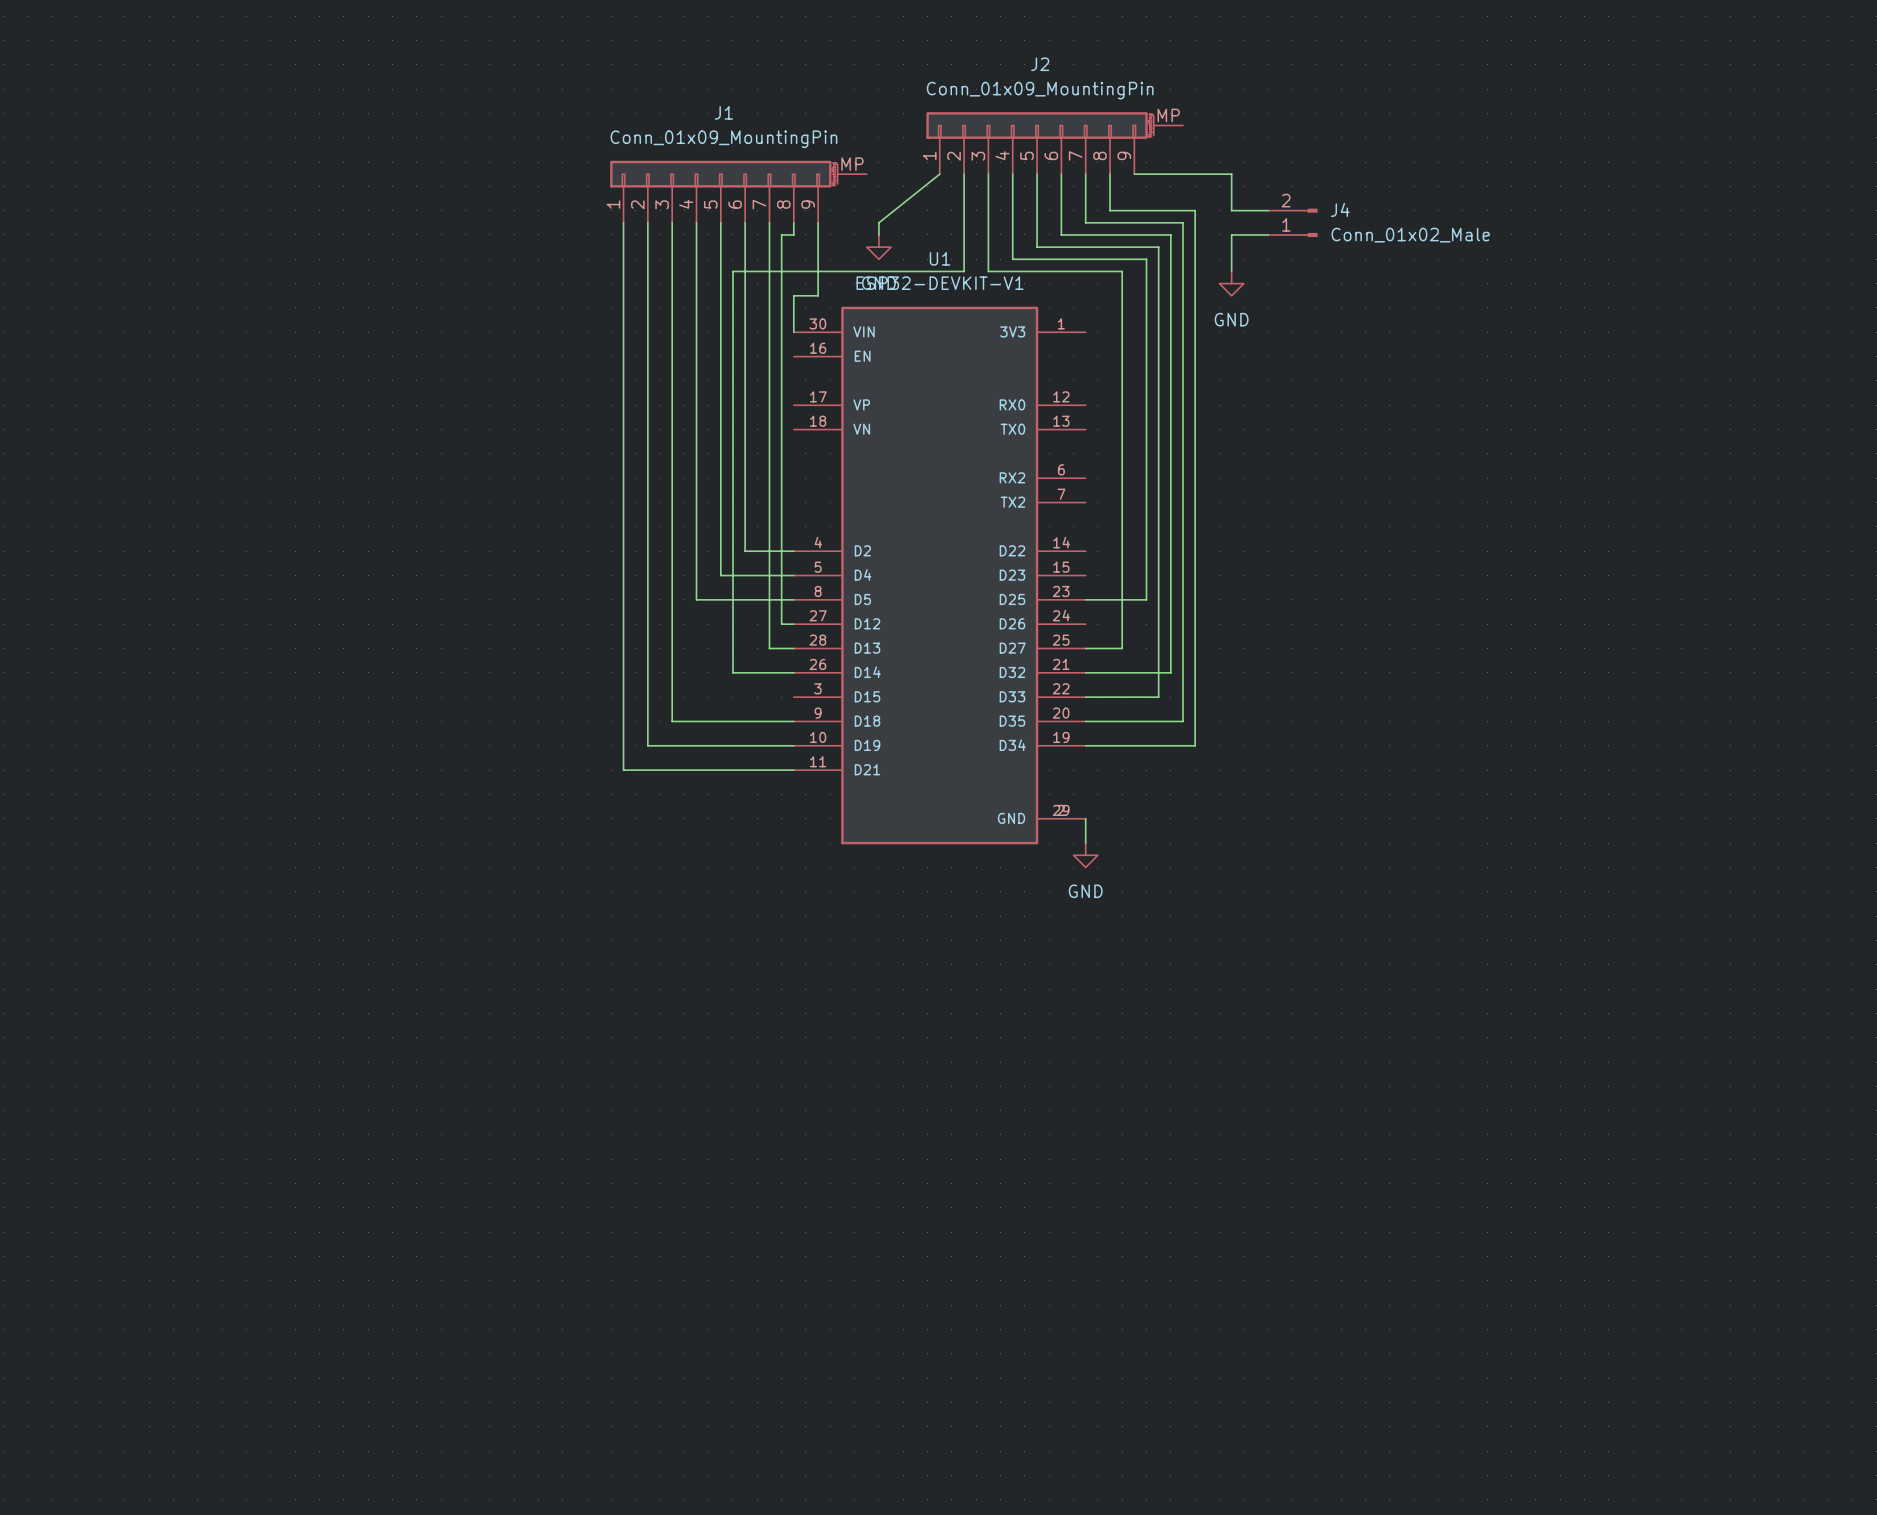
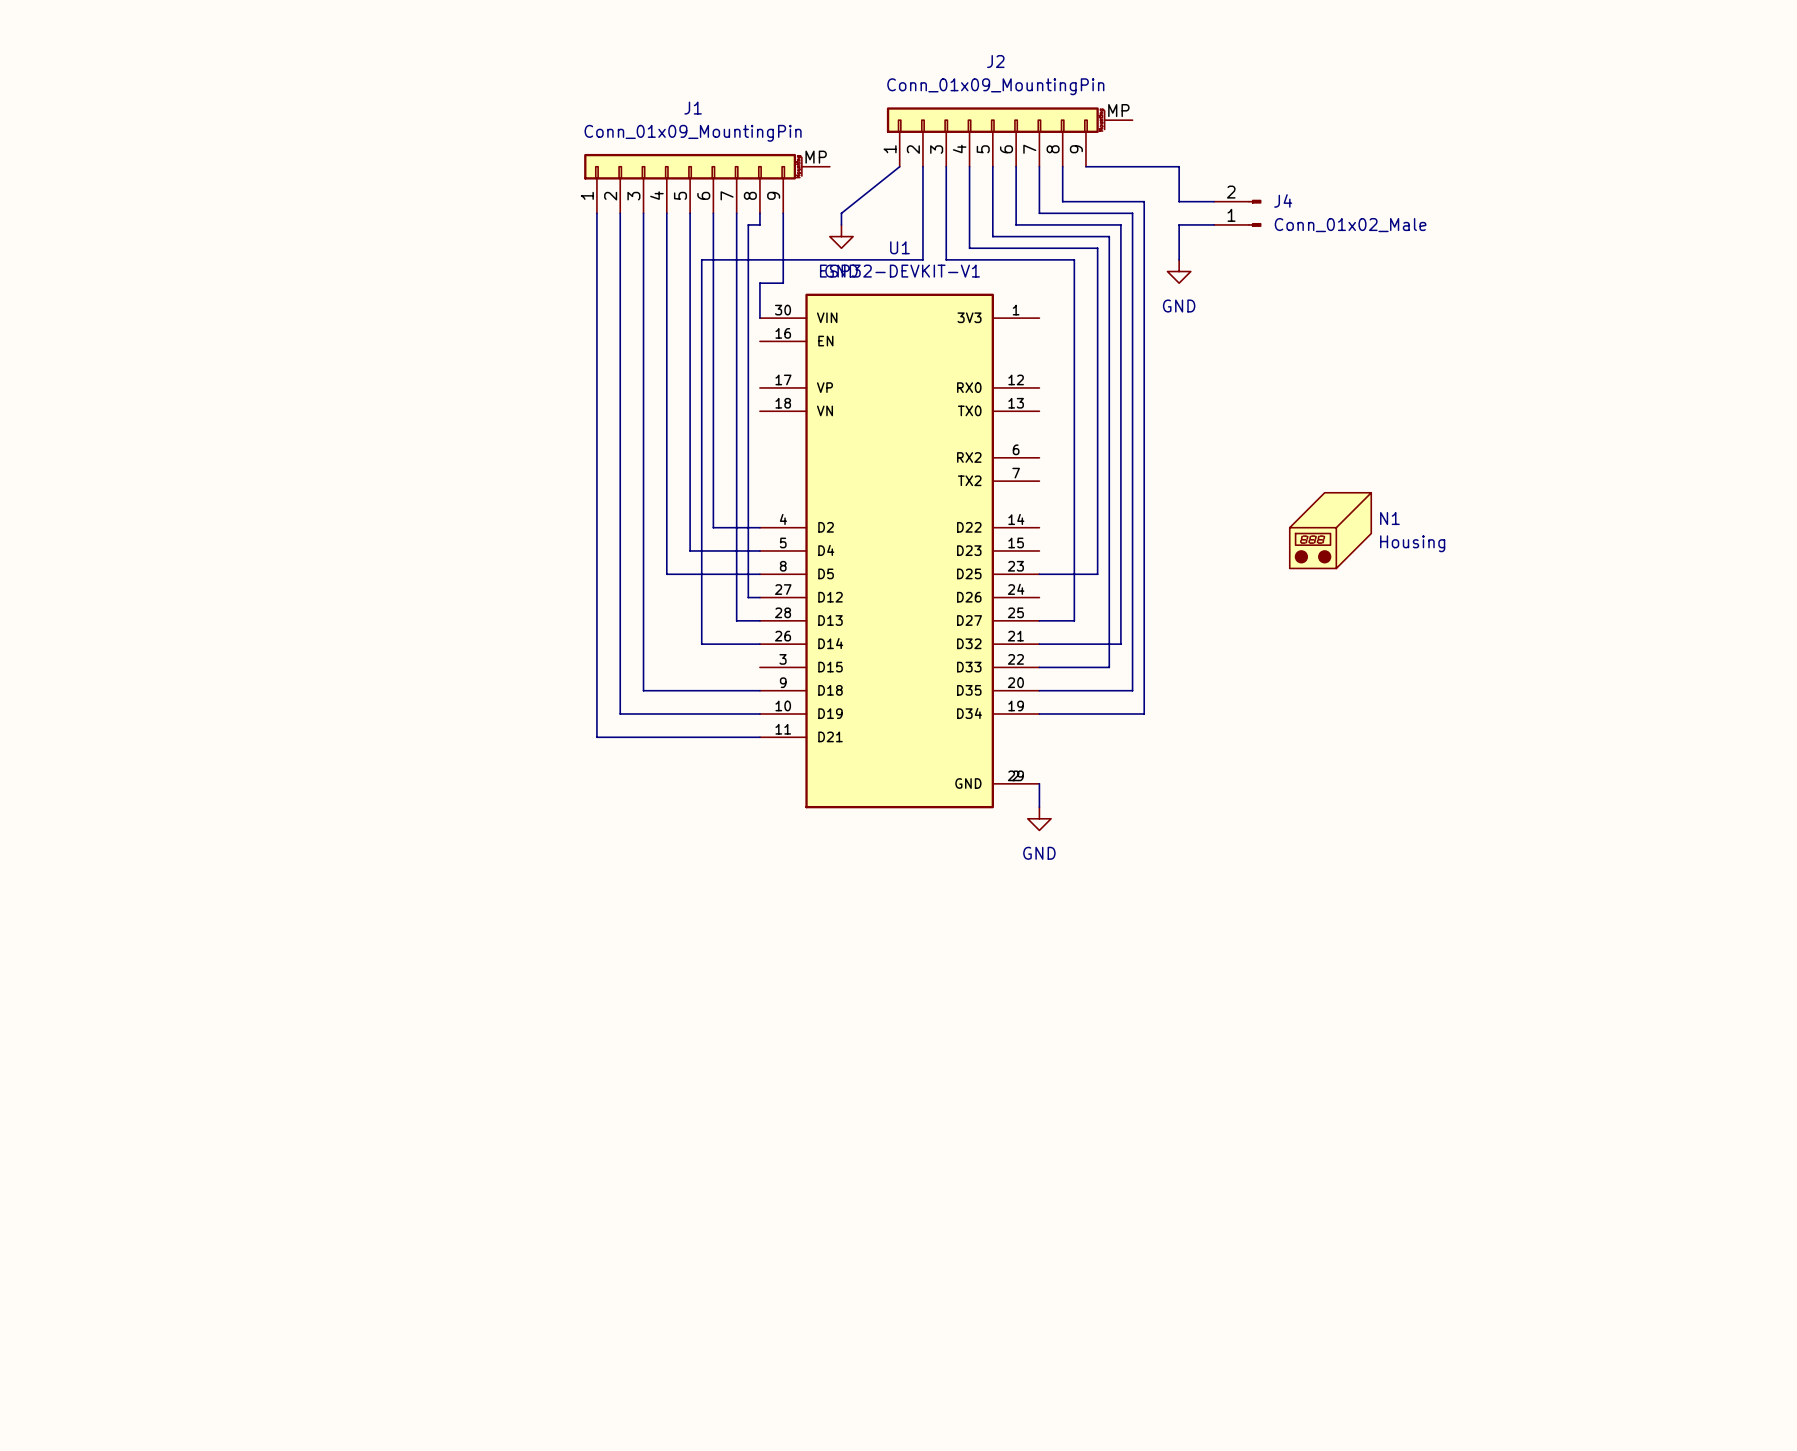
N1: none -> Housing (1330, 530)

